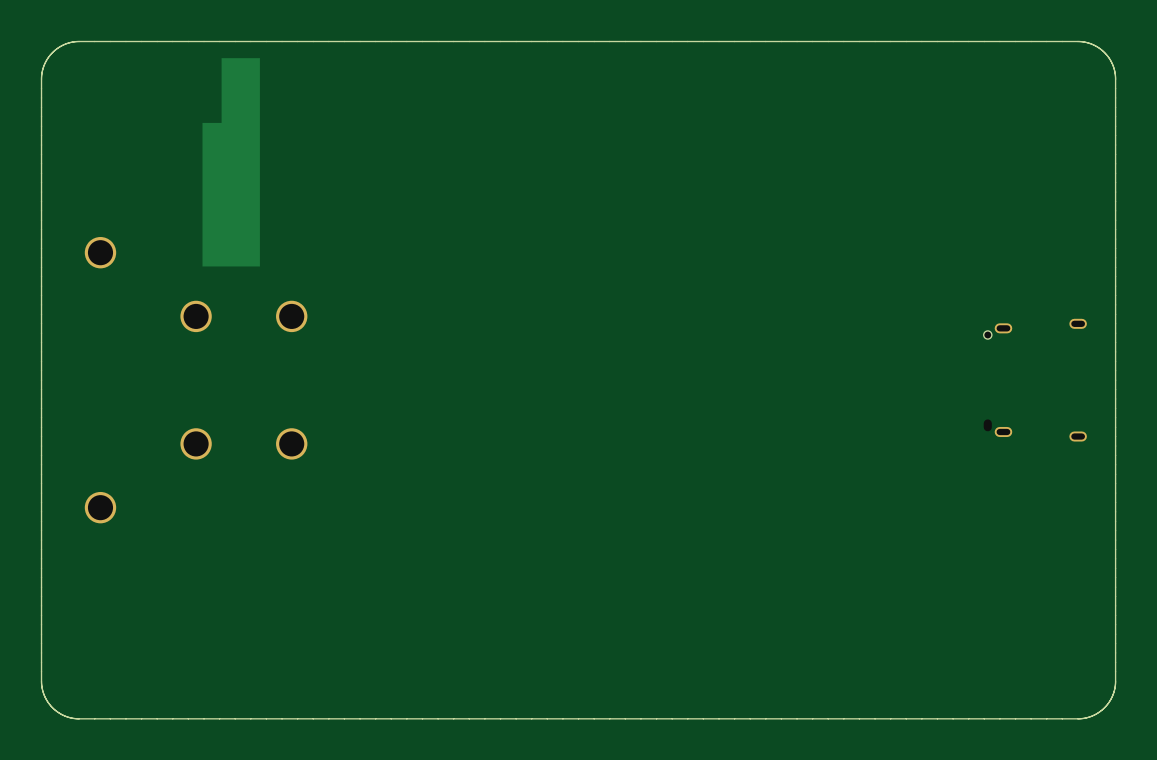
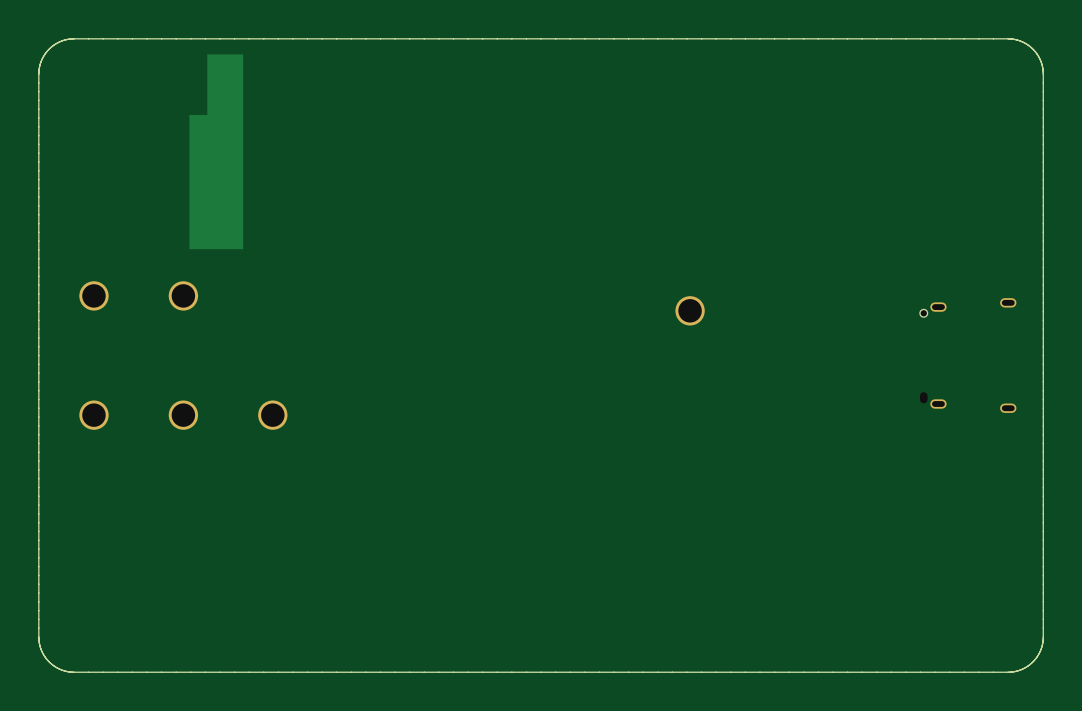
part position: (100, 252) -> (93, 295)
part: (291, 316) -> none
part: none -> (690, 310)
part position: (100, 507) -> (93, 415)

